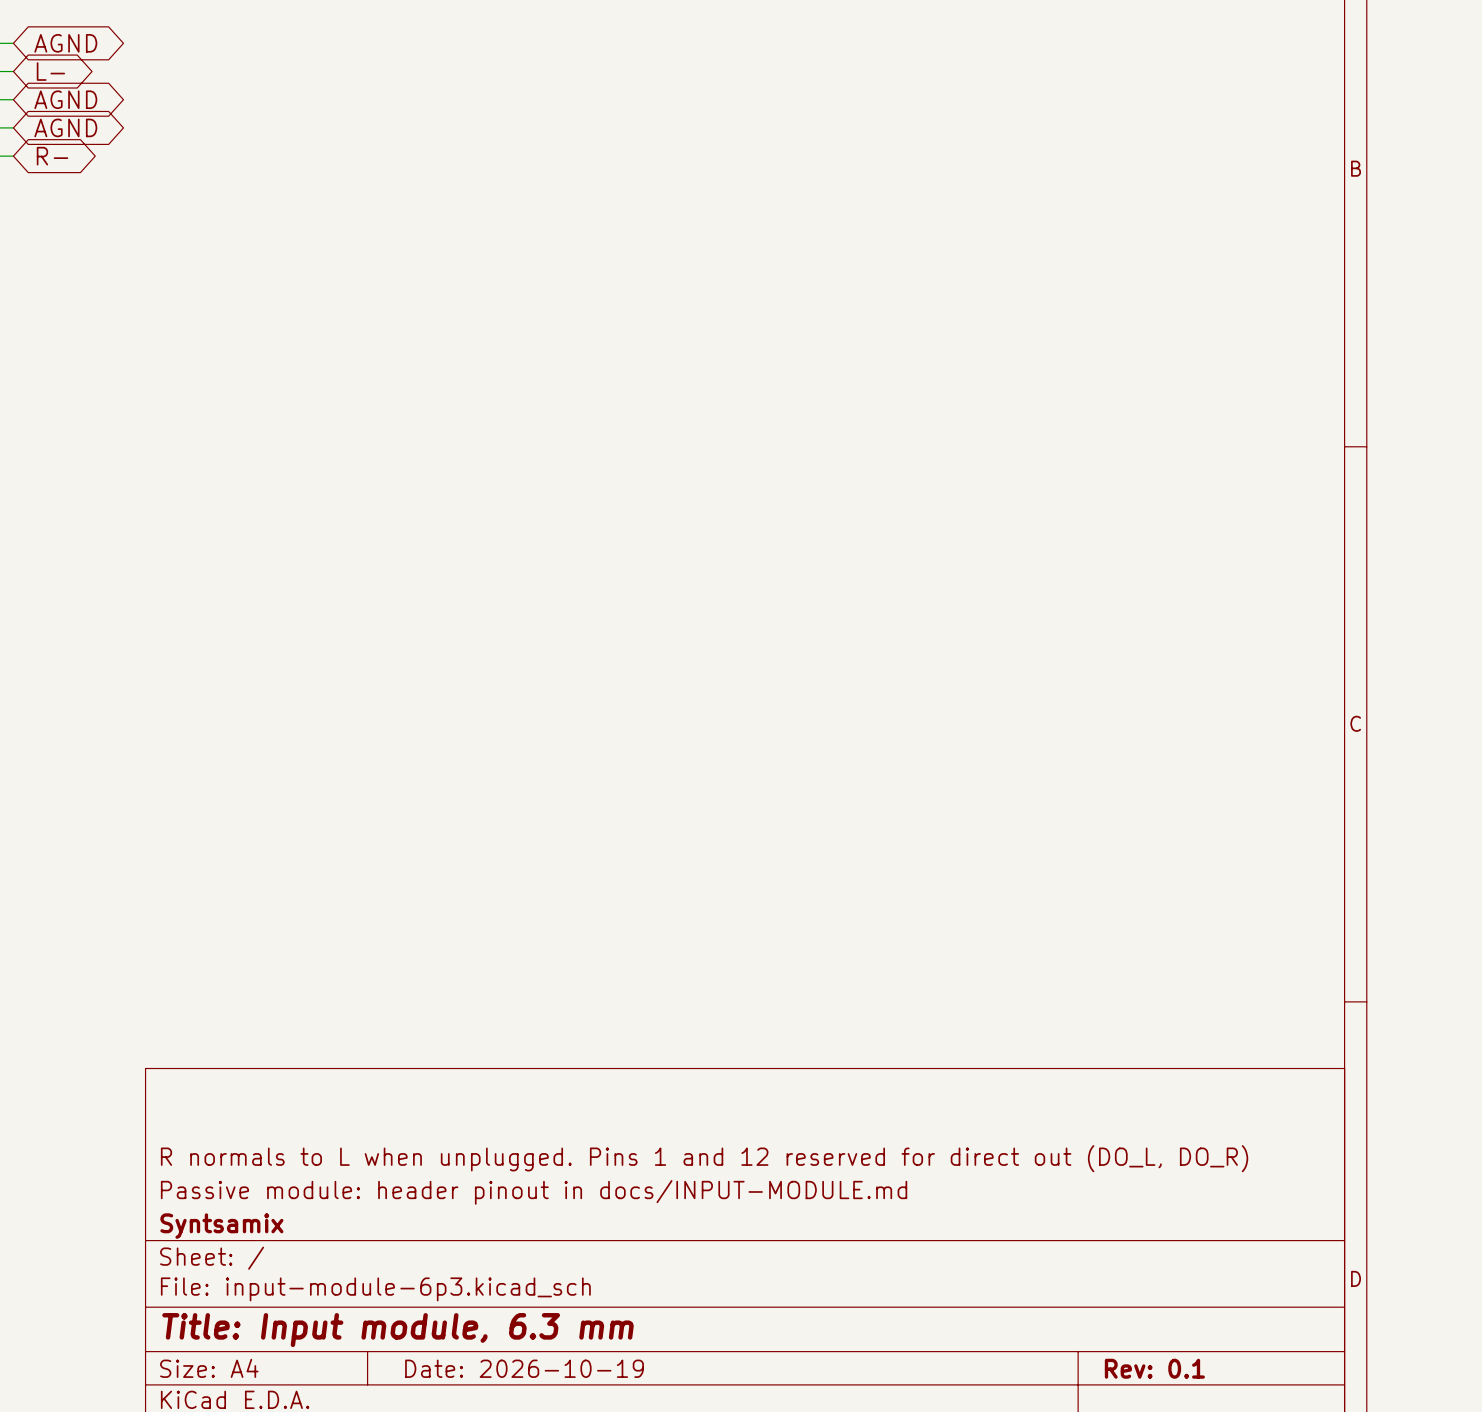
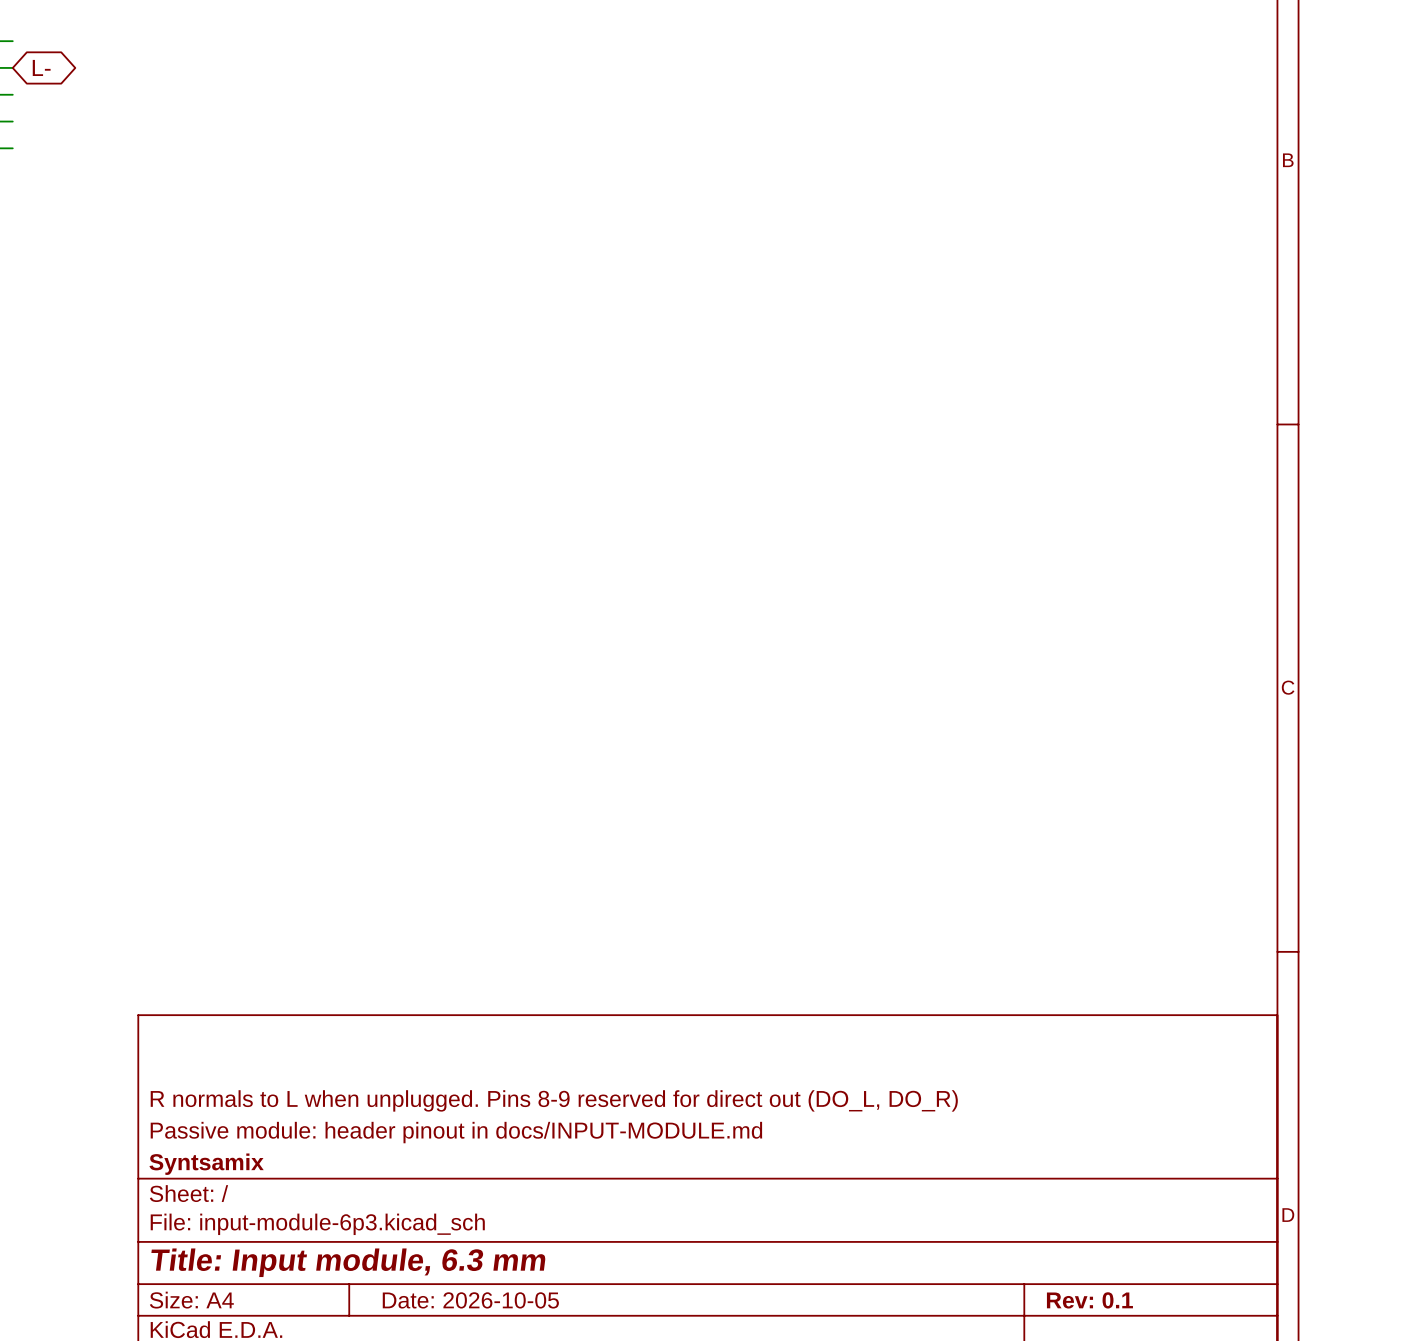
global label: AGND (65, 43) -> none
global label: AGND (65, 99) -> none
global label: AGND (65, 127) -> none
global label: R- (52, 156) -> none
title block: R normals to L when unplugged. Pins 1 and 12 reserved for direct out (DO_L, DO_R) (704, 1158) -> R normals to L when unplugged. Pins 8-9 reserved for direct out (DO_L, DO_R) (554, 1100)
title block: Date: 2026-10-19 (524, 1368) -> Date: 2026-10-05 (470, 1300)

